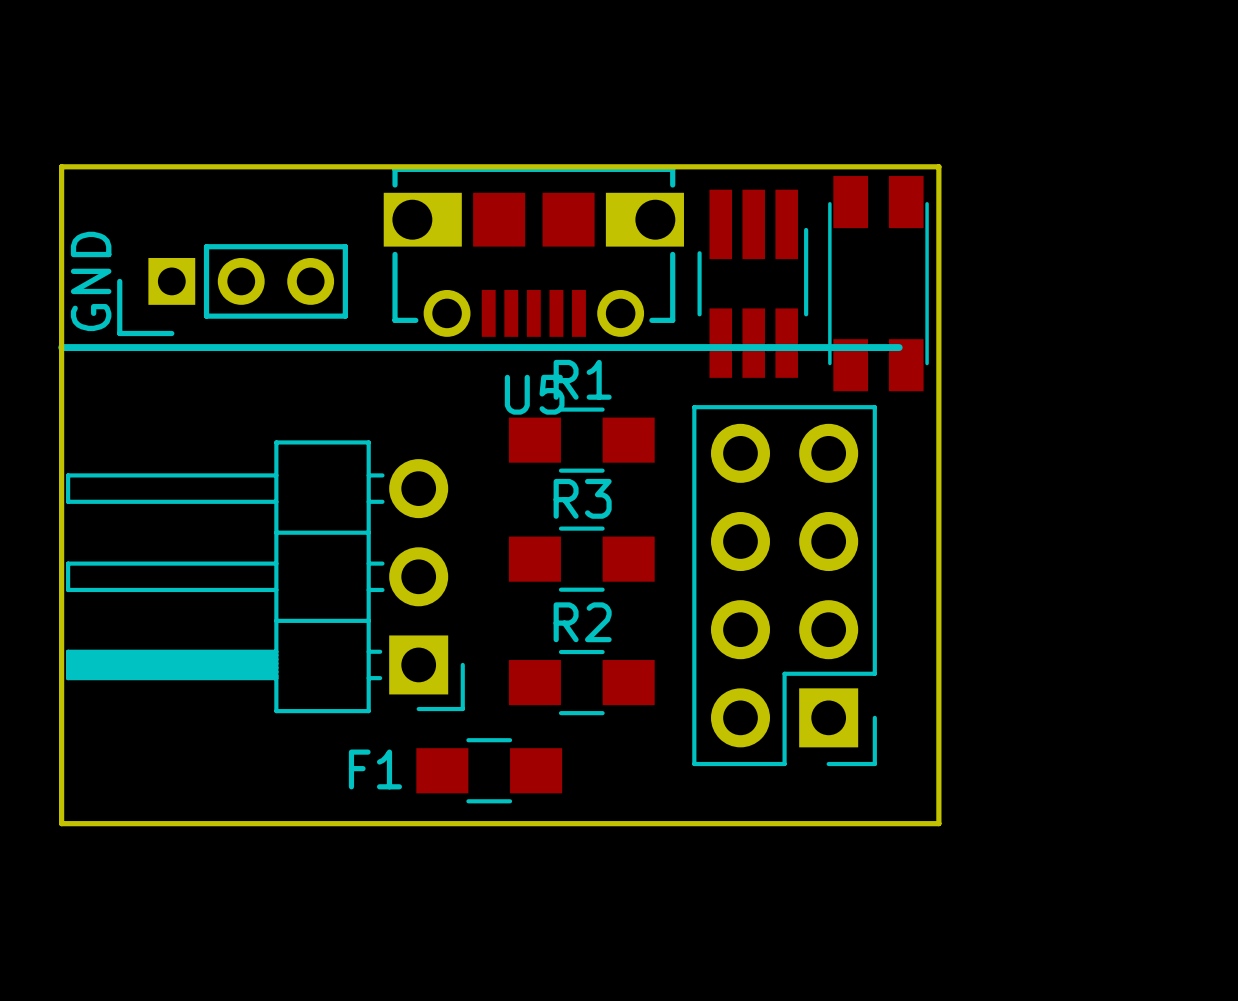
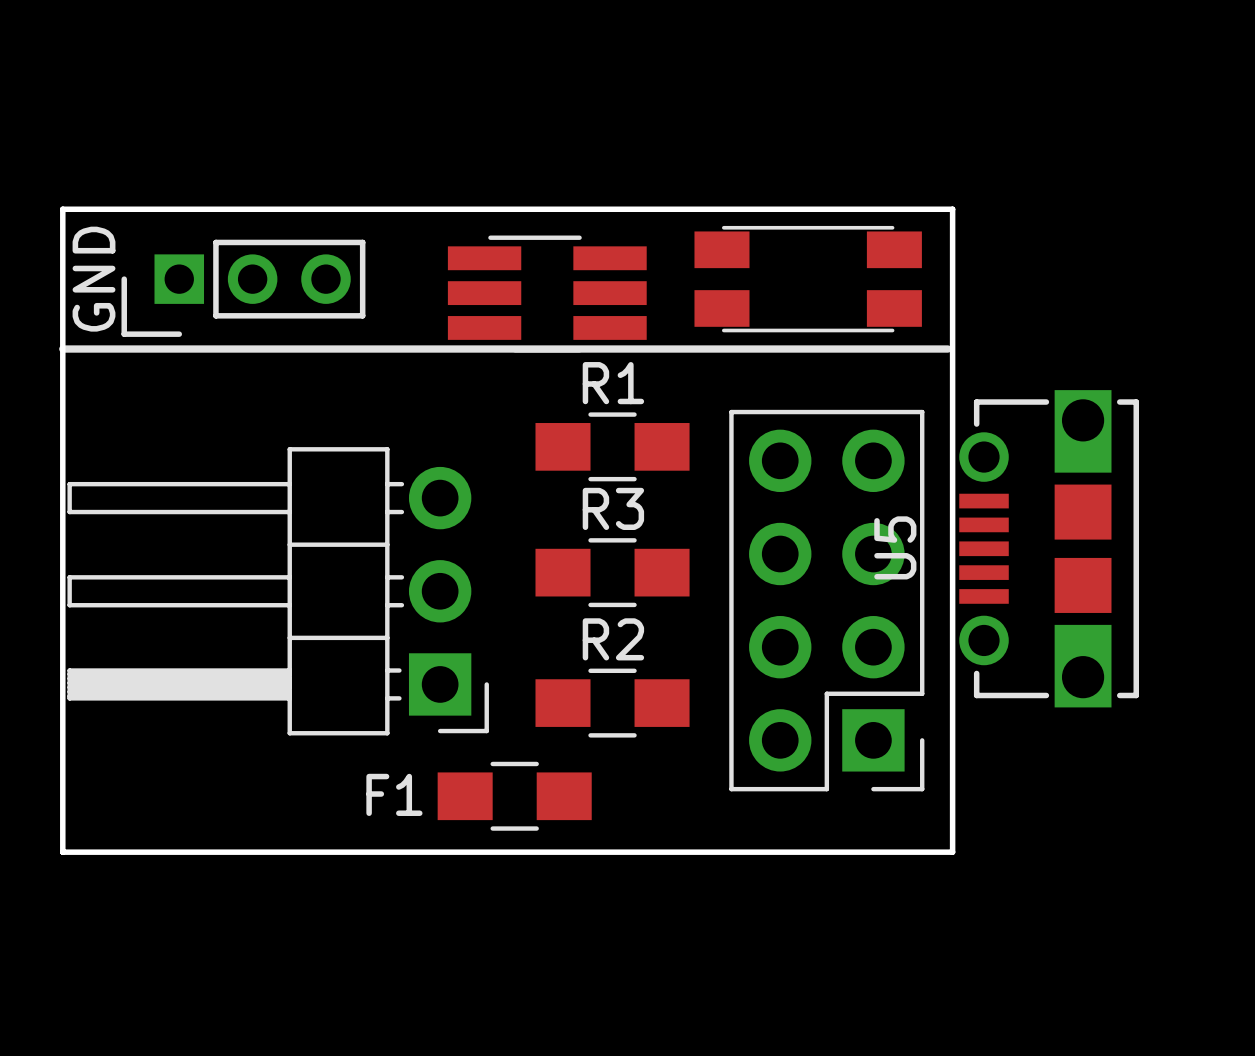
part footprint: [697, 189, 809, 378] -> [694, 225, 922, 333]
board edge: (61, 215) (61, 166) (938, 166) (938, 823) (903, 823) -> (62, 209) (952, 209) (952, 852)
U5 rotation: 0° (533, 251) -> 90° clockwise (1049, 548)
U5 position: (533, 251) -> (1049, 548)
part: (878, 283) -> none
part: none -> (547, 294)

